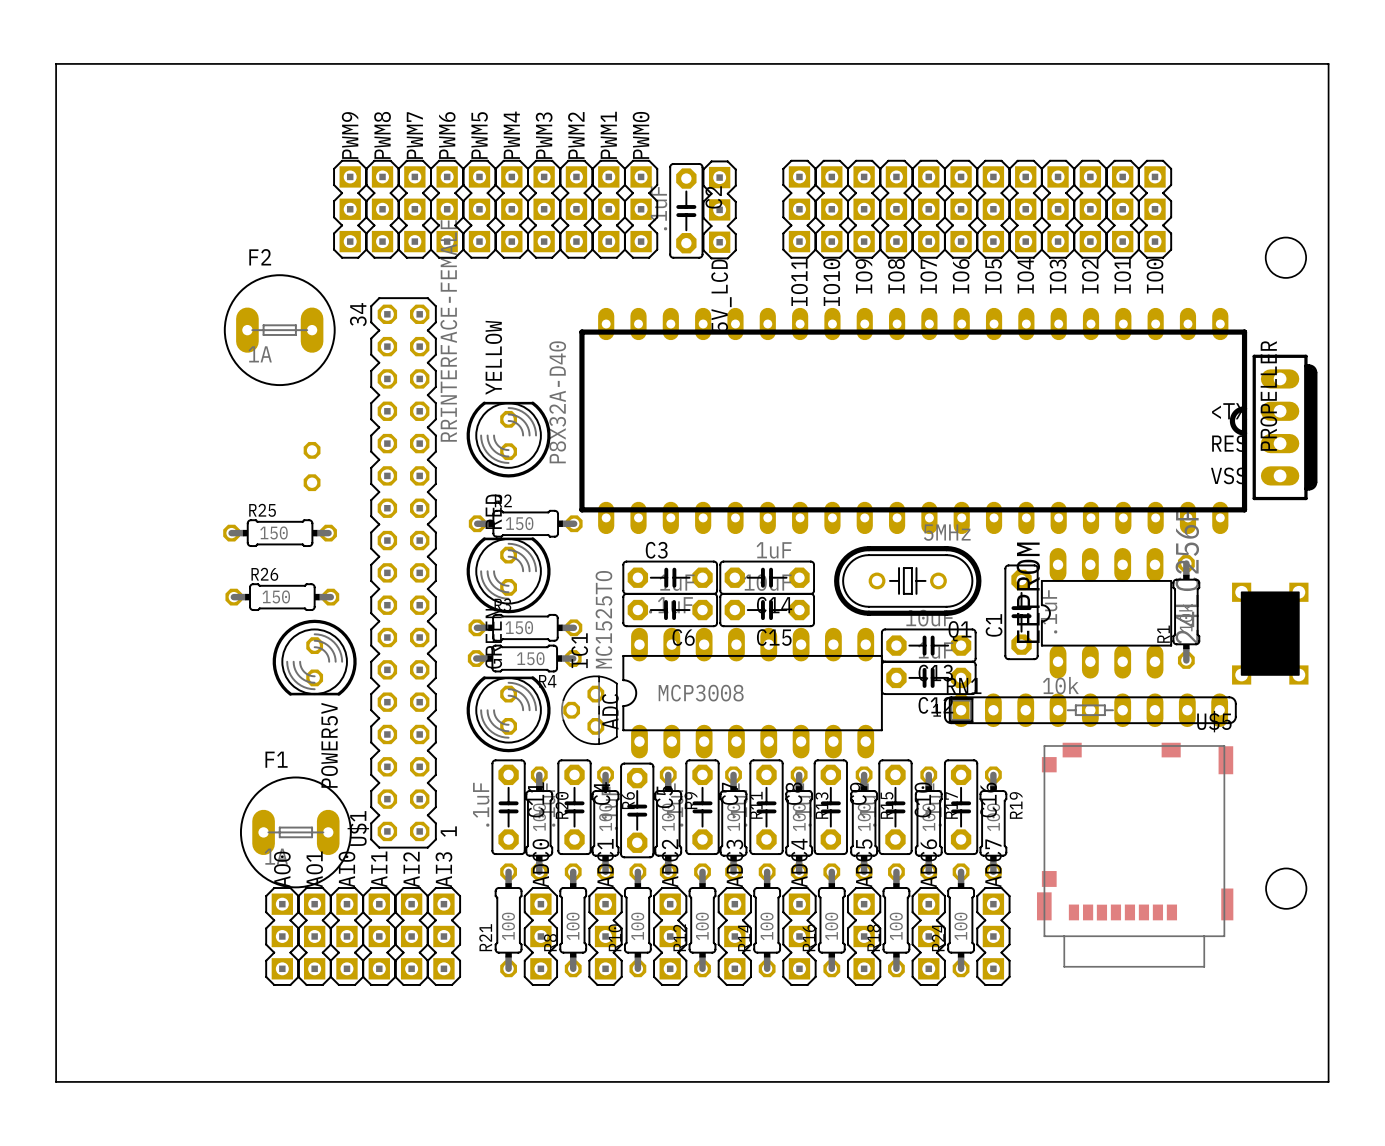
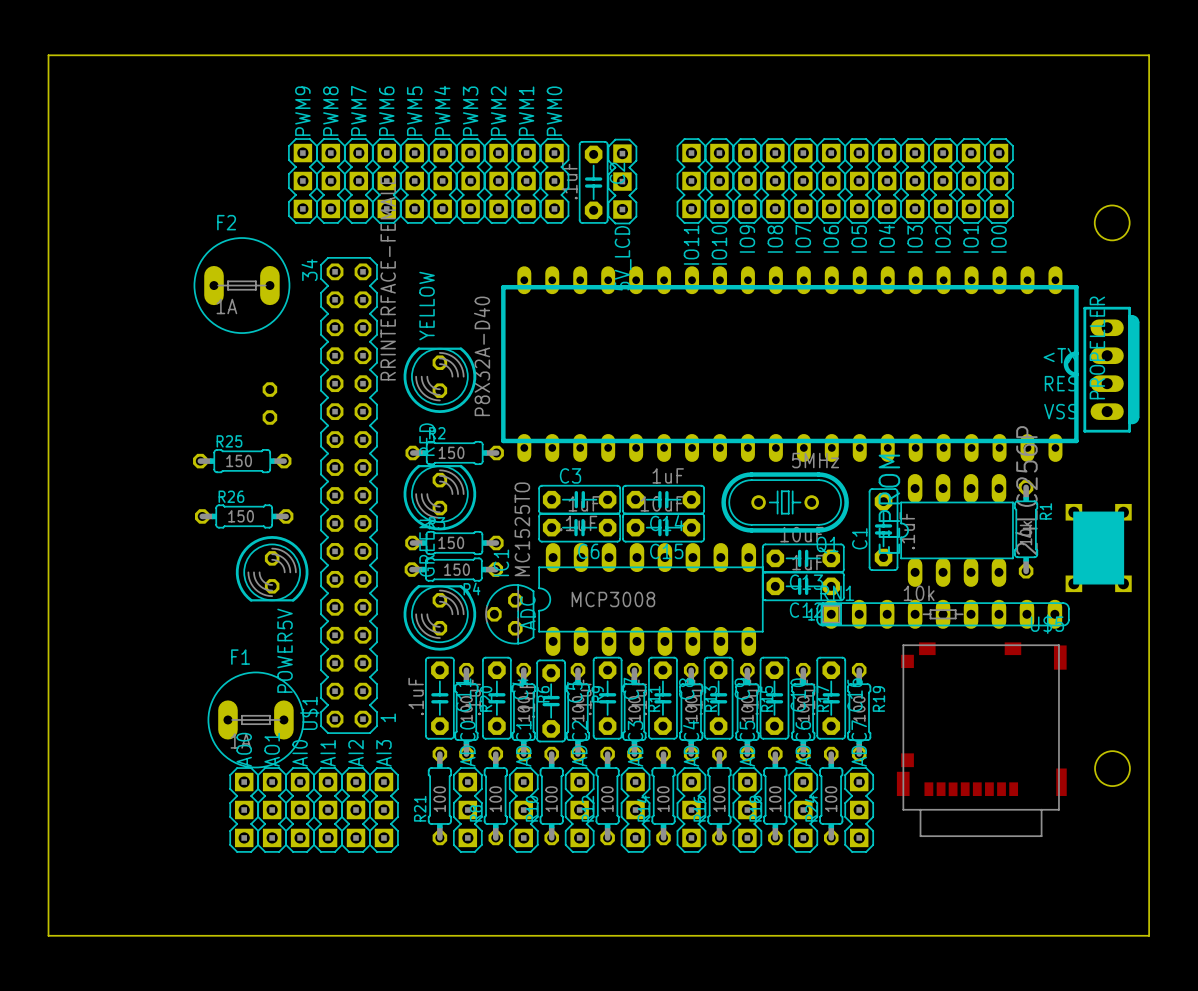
R1 name position: R1 (1163, 634) -> R1 (1045, 511)

